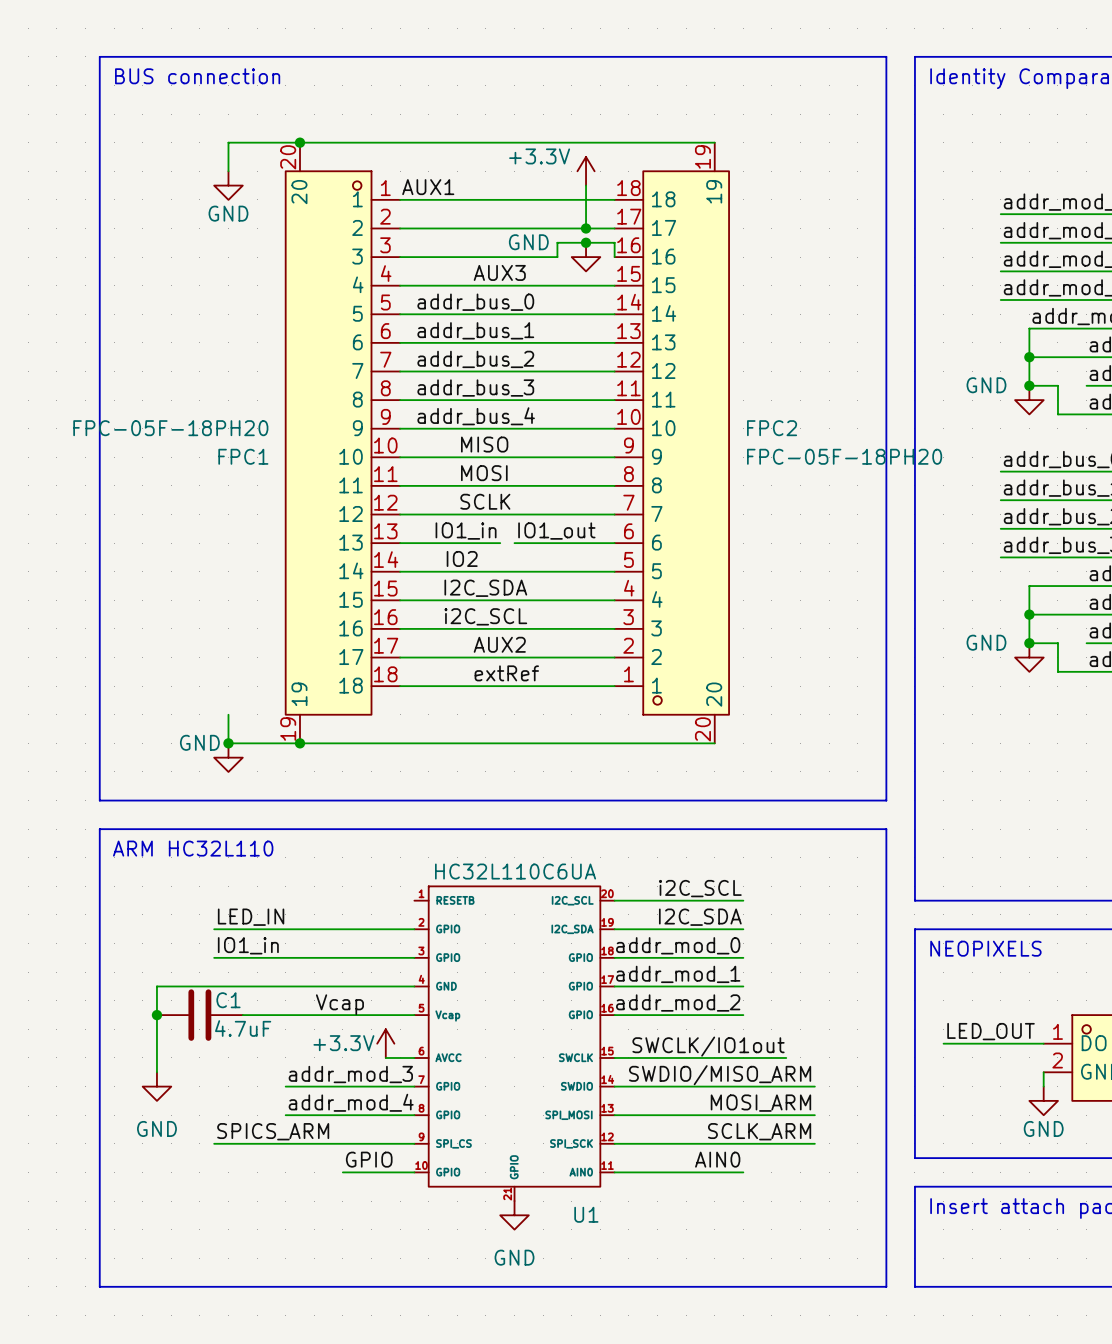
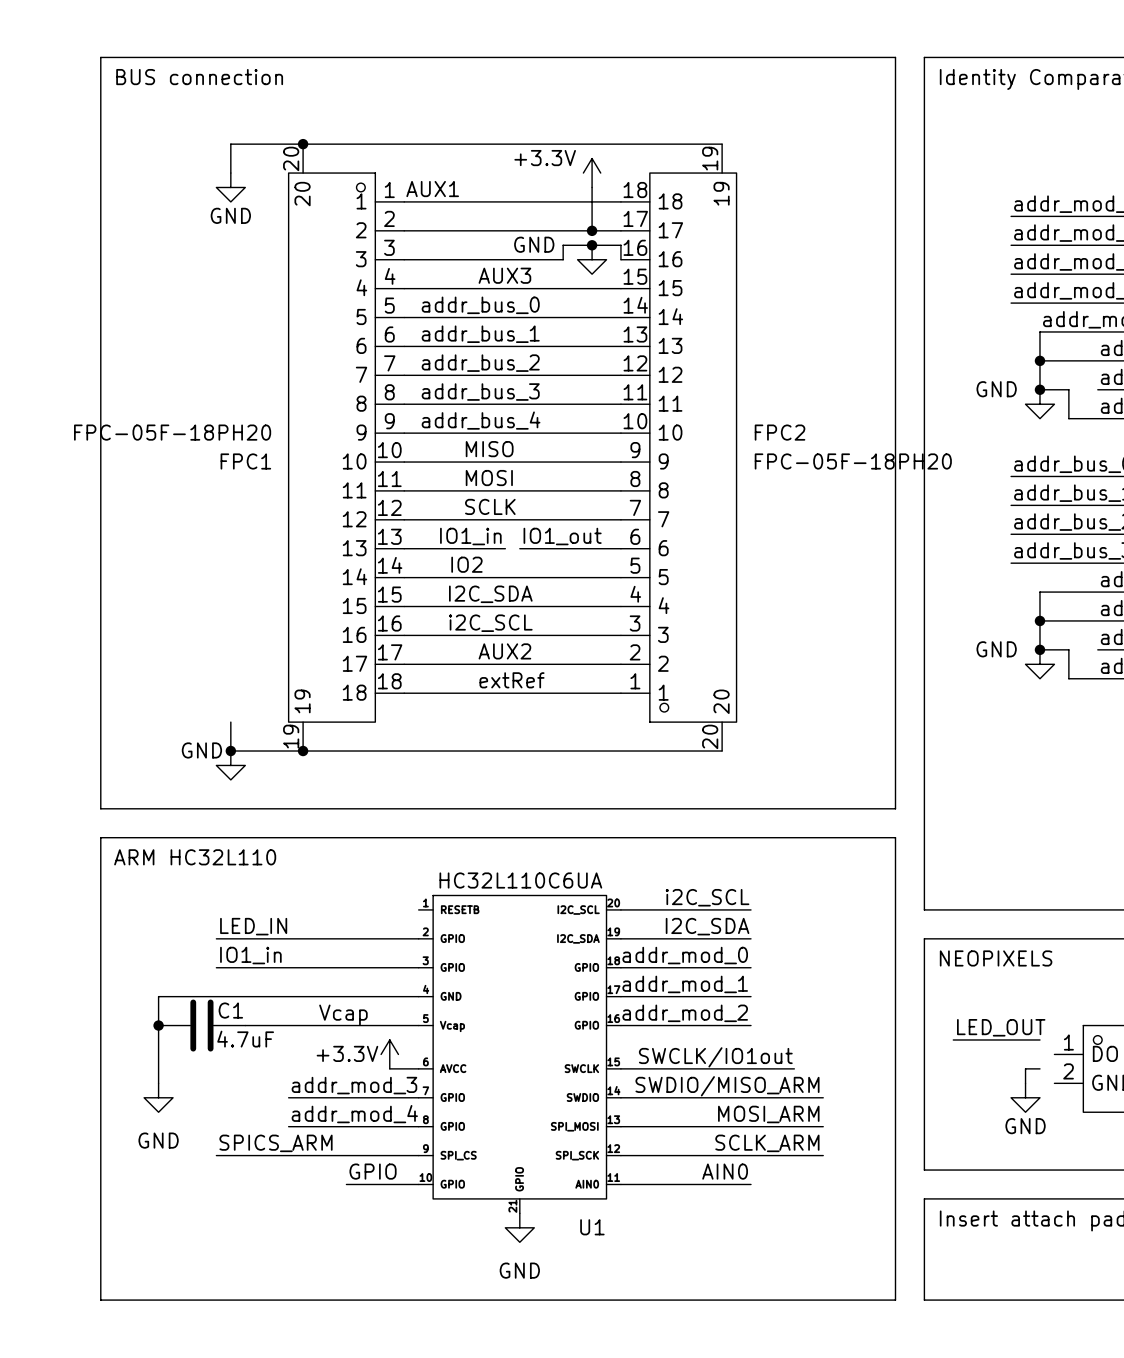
wire: none -> (953, 1039) (1039, 1039)
label position: LED_OUT (991, 1031) -> LED_OUT (1001, 1027)
wire: (943, 1043) (1043, 1043) -> none
wire: none -> (1039, 1068) (1025, 1068) (1025, 1083)
wire: (1043, 1072) (1043, 1086) -> none
power symbol position: GND (1043, 1100) -> GND (1025, 1097)

